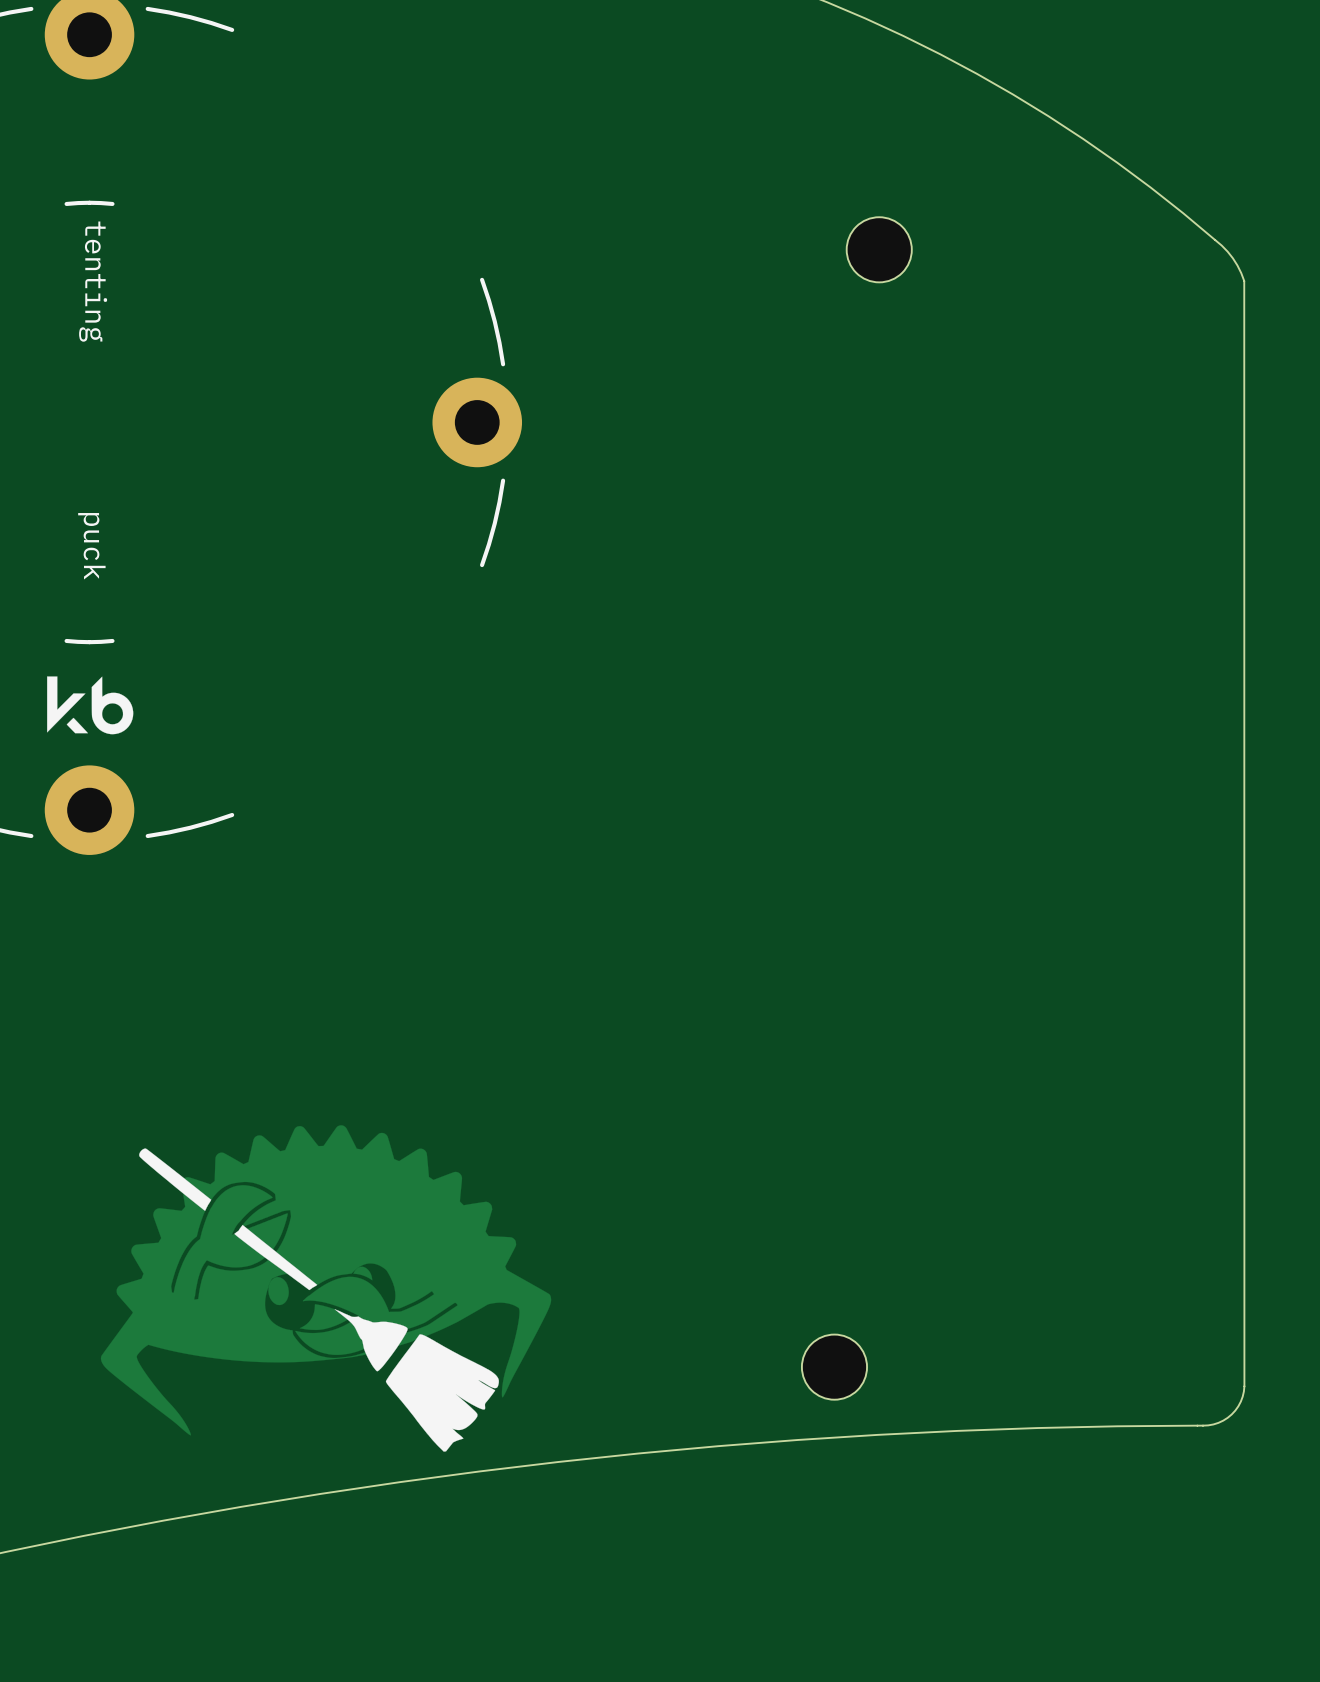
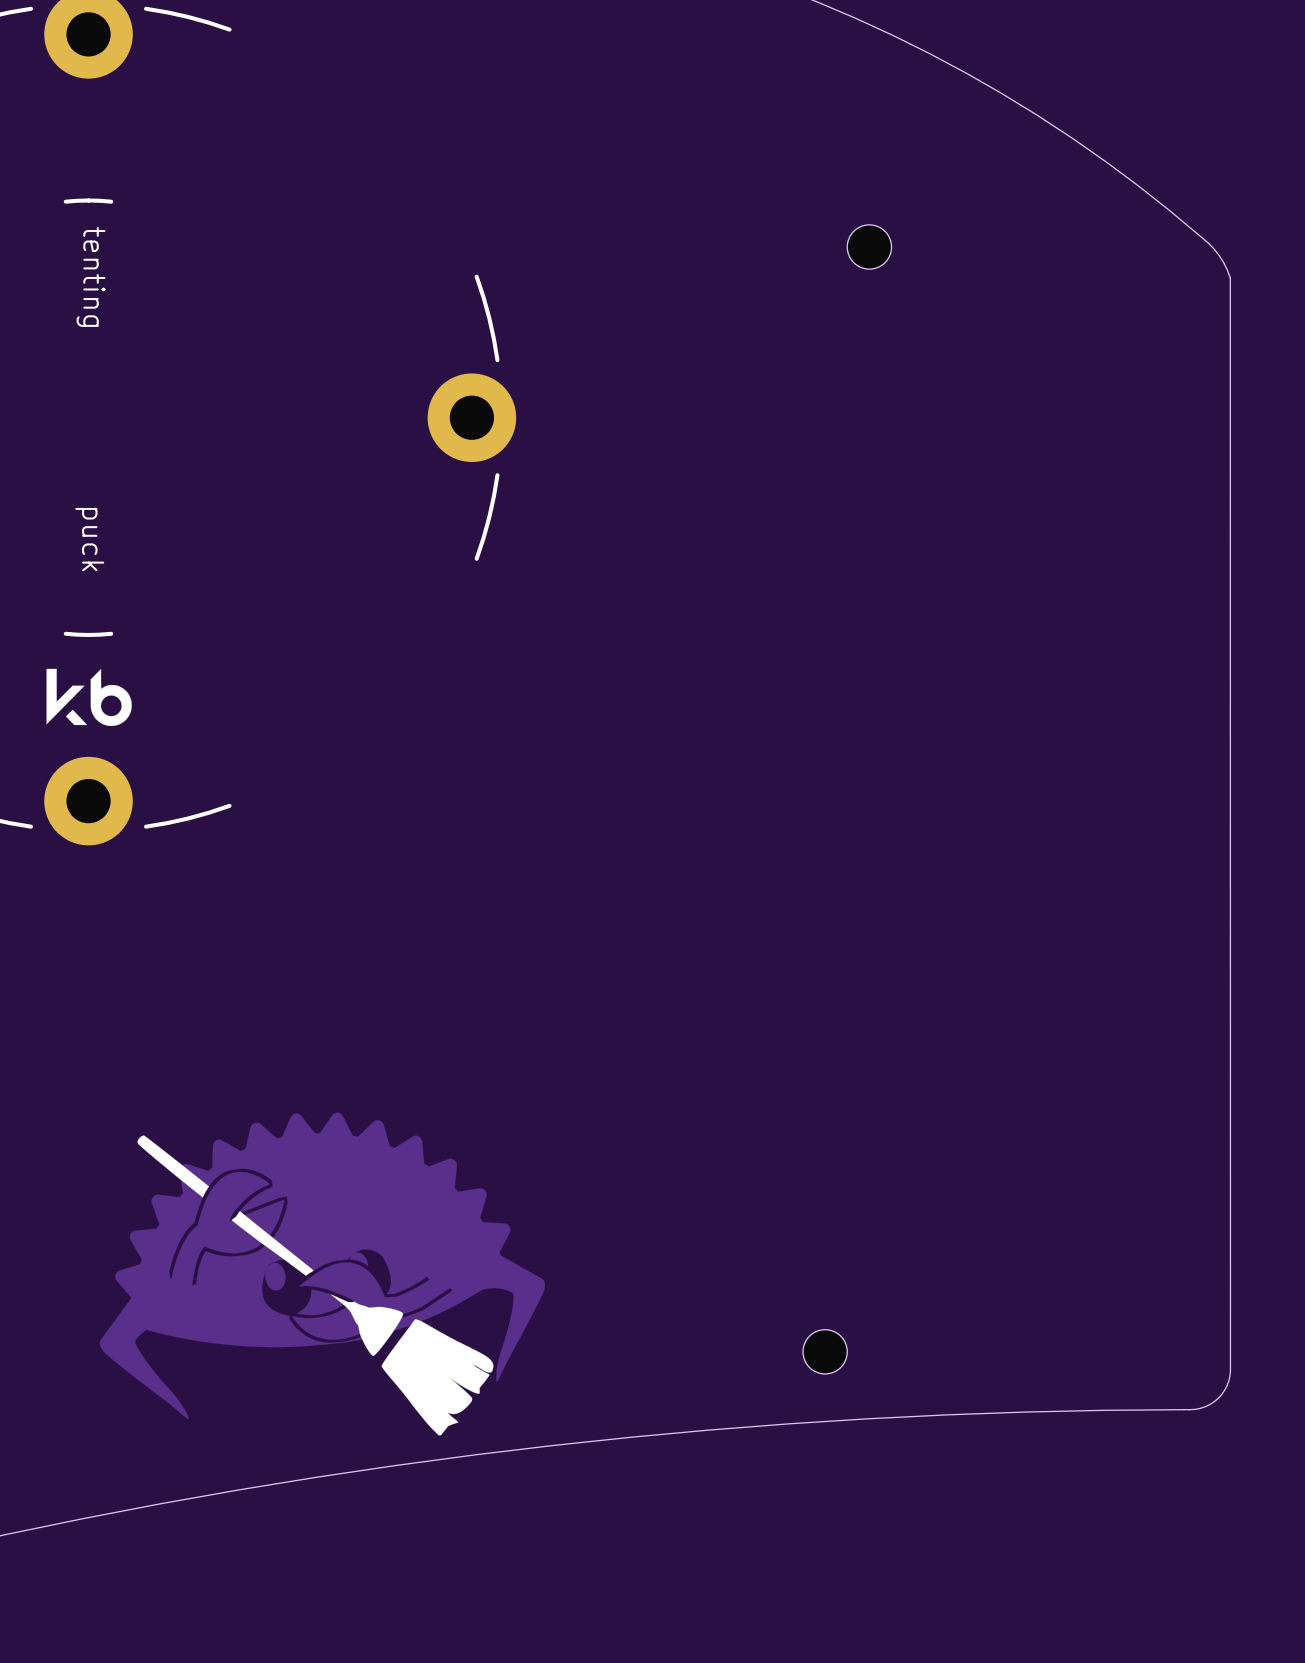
part footprint: [846, 217, 912, 283] -> [847, 224, 892, 270]
part footprint: [801, 1334, 868, 1400] -> [802, 1329, 848, 1374]

